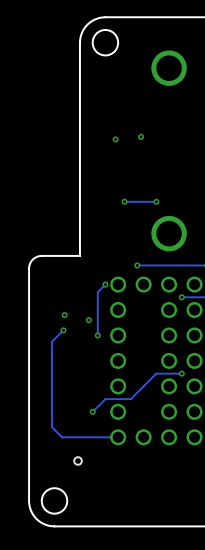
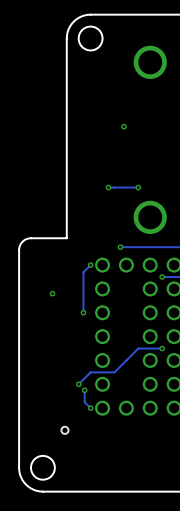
via: (115, 139) -> none
via: (88, 320) -> none
track: (63, 330) (51, 341) (51, 427) (62, 437) (118, 437) -> none
via: (63, 330) -> none
track: none -> (84, 390) (84, 402) (90, 408)
via: none -> (84, 390)
via: none -> (90, 408)

